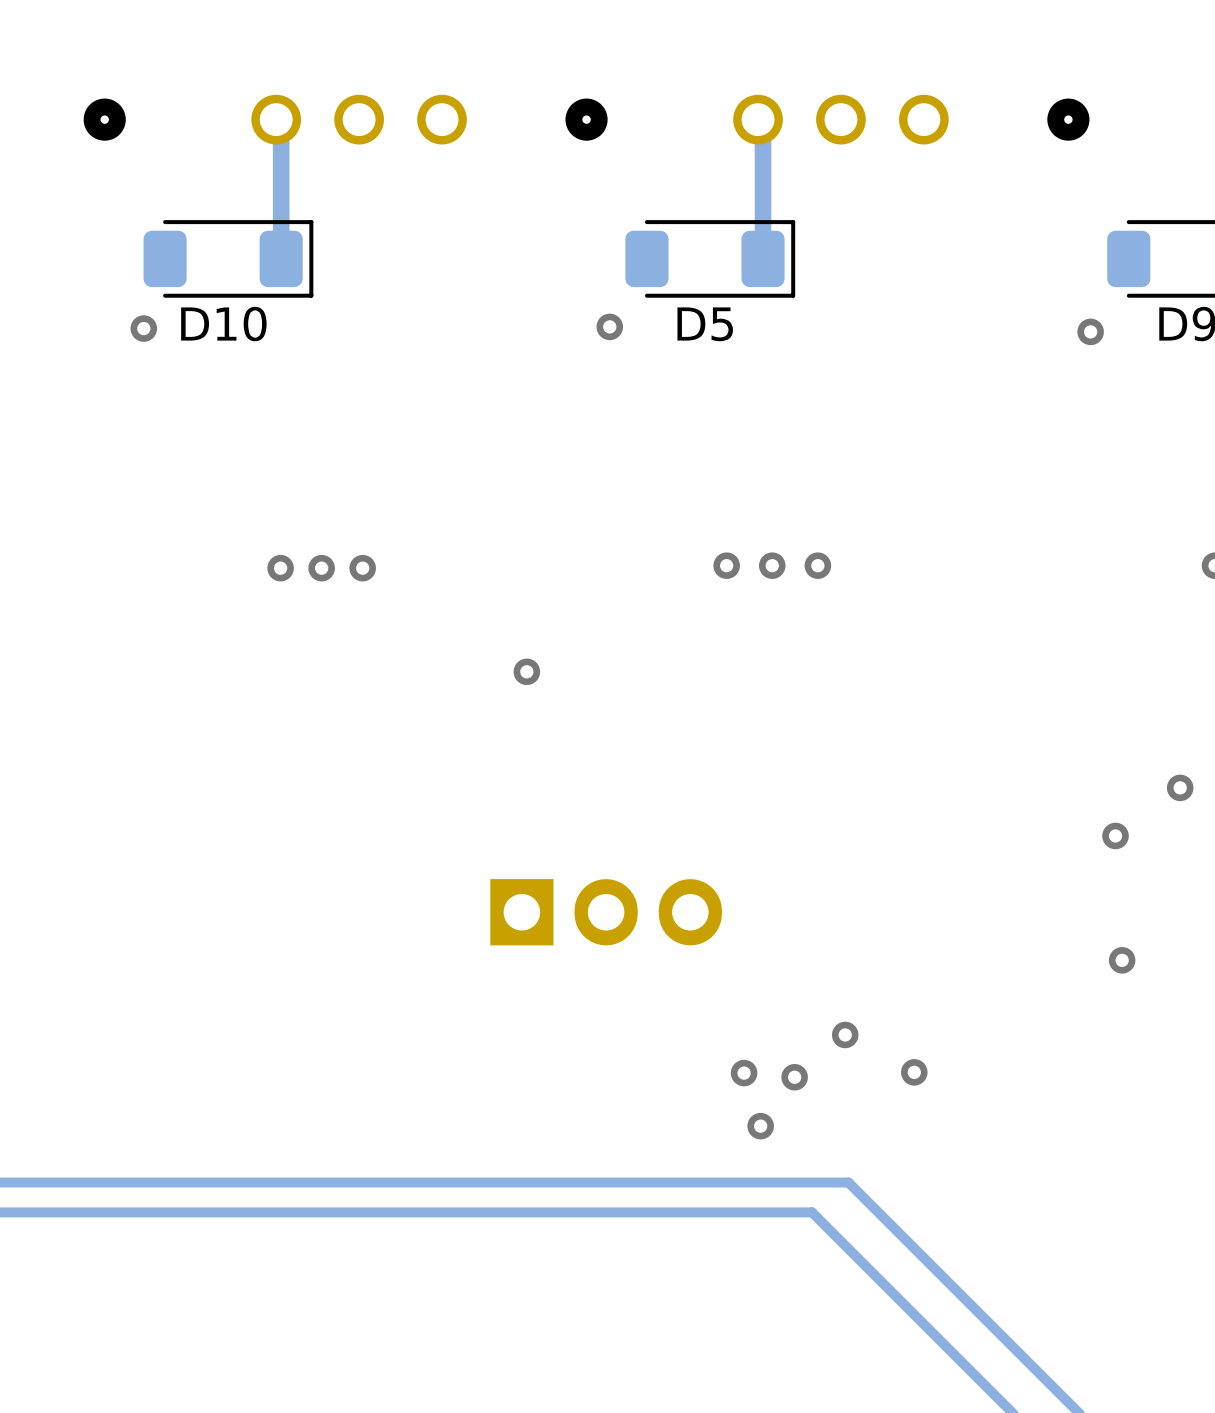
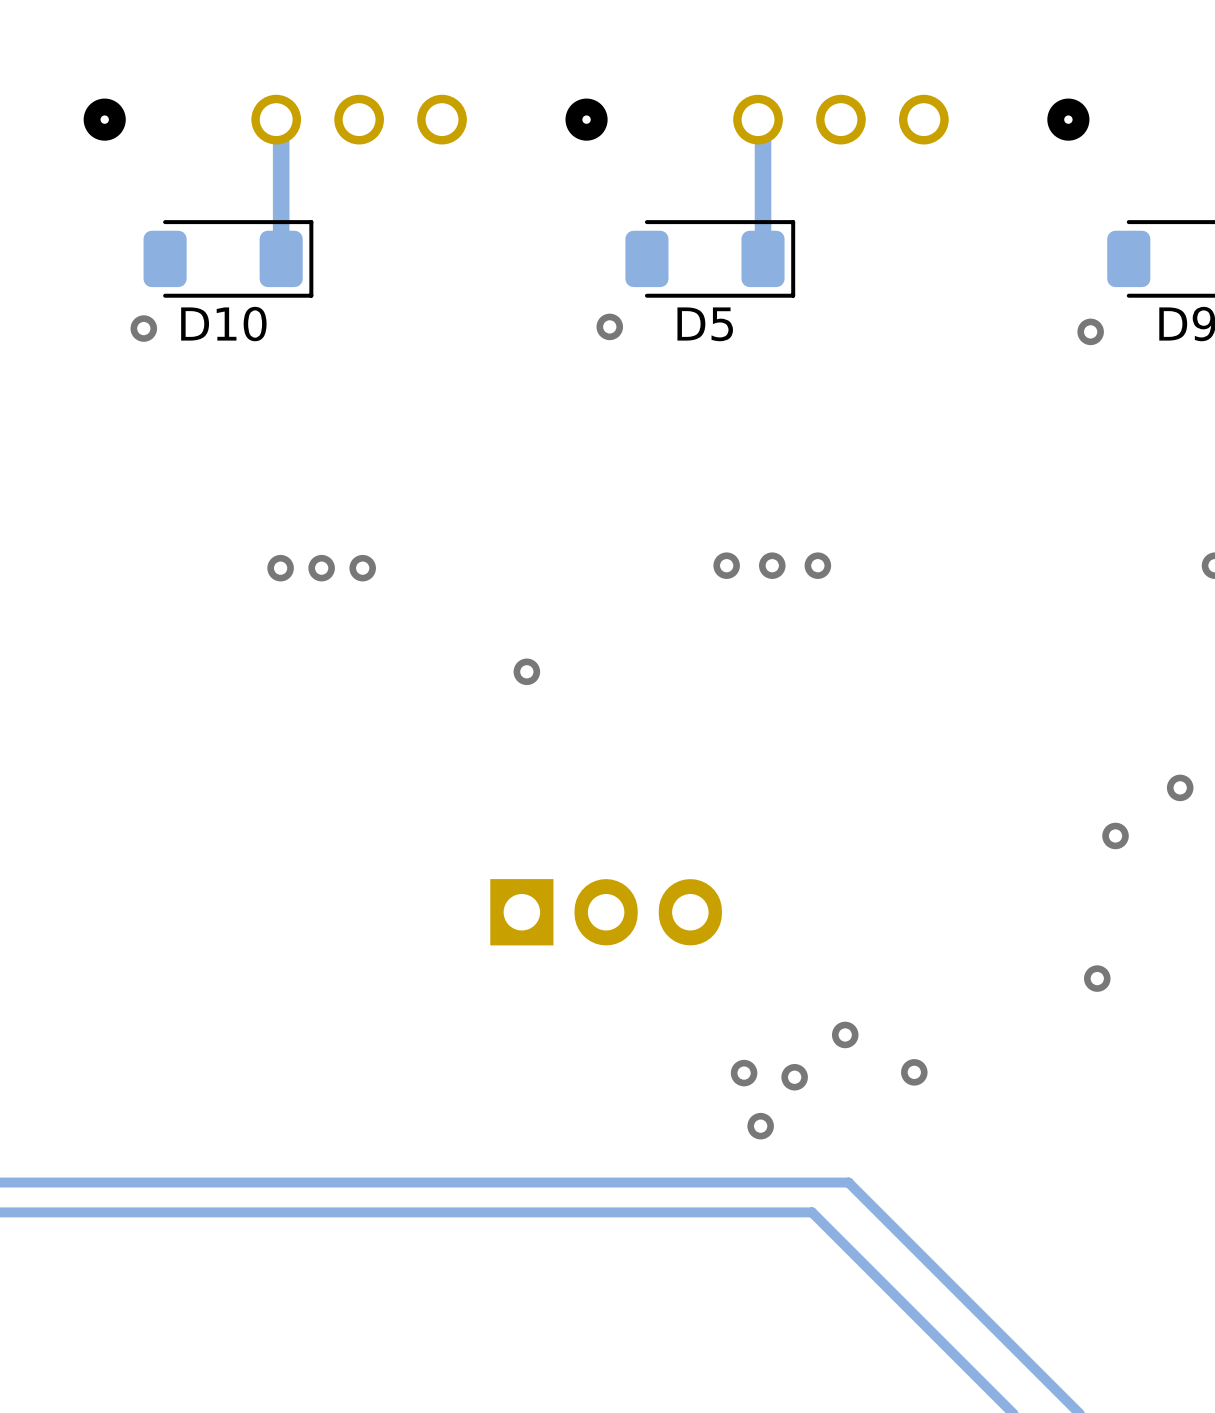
via position: (1122, 960) -> (1097, 978)

